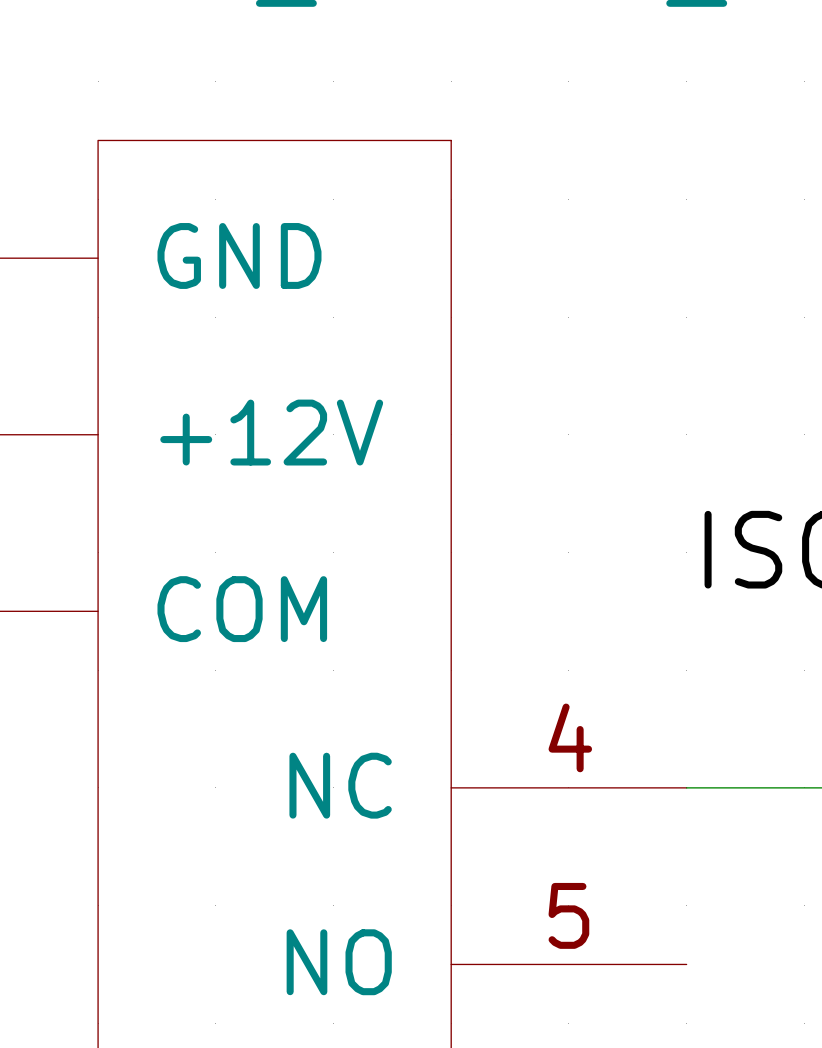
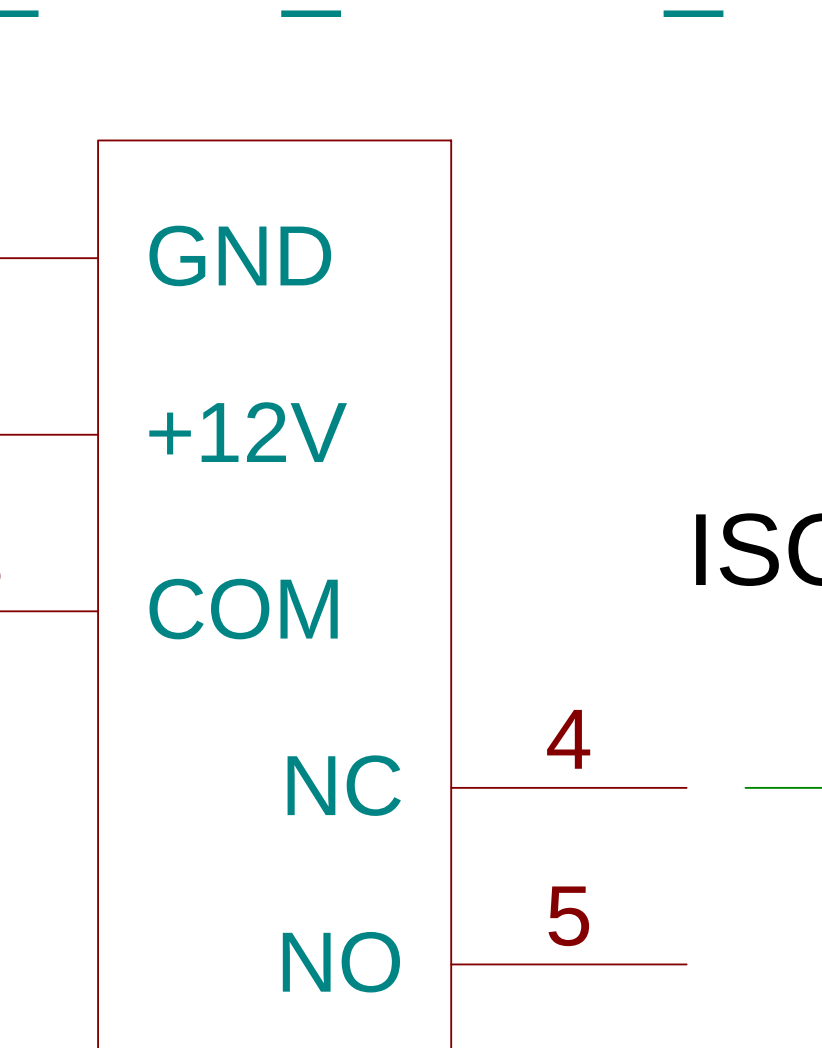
wire: (686, 787) (745, 787) -> none

